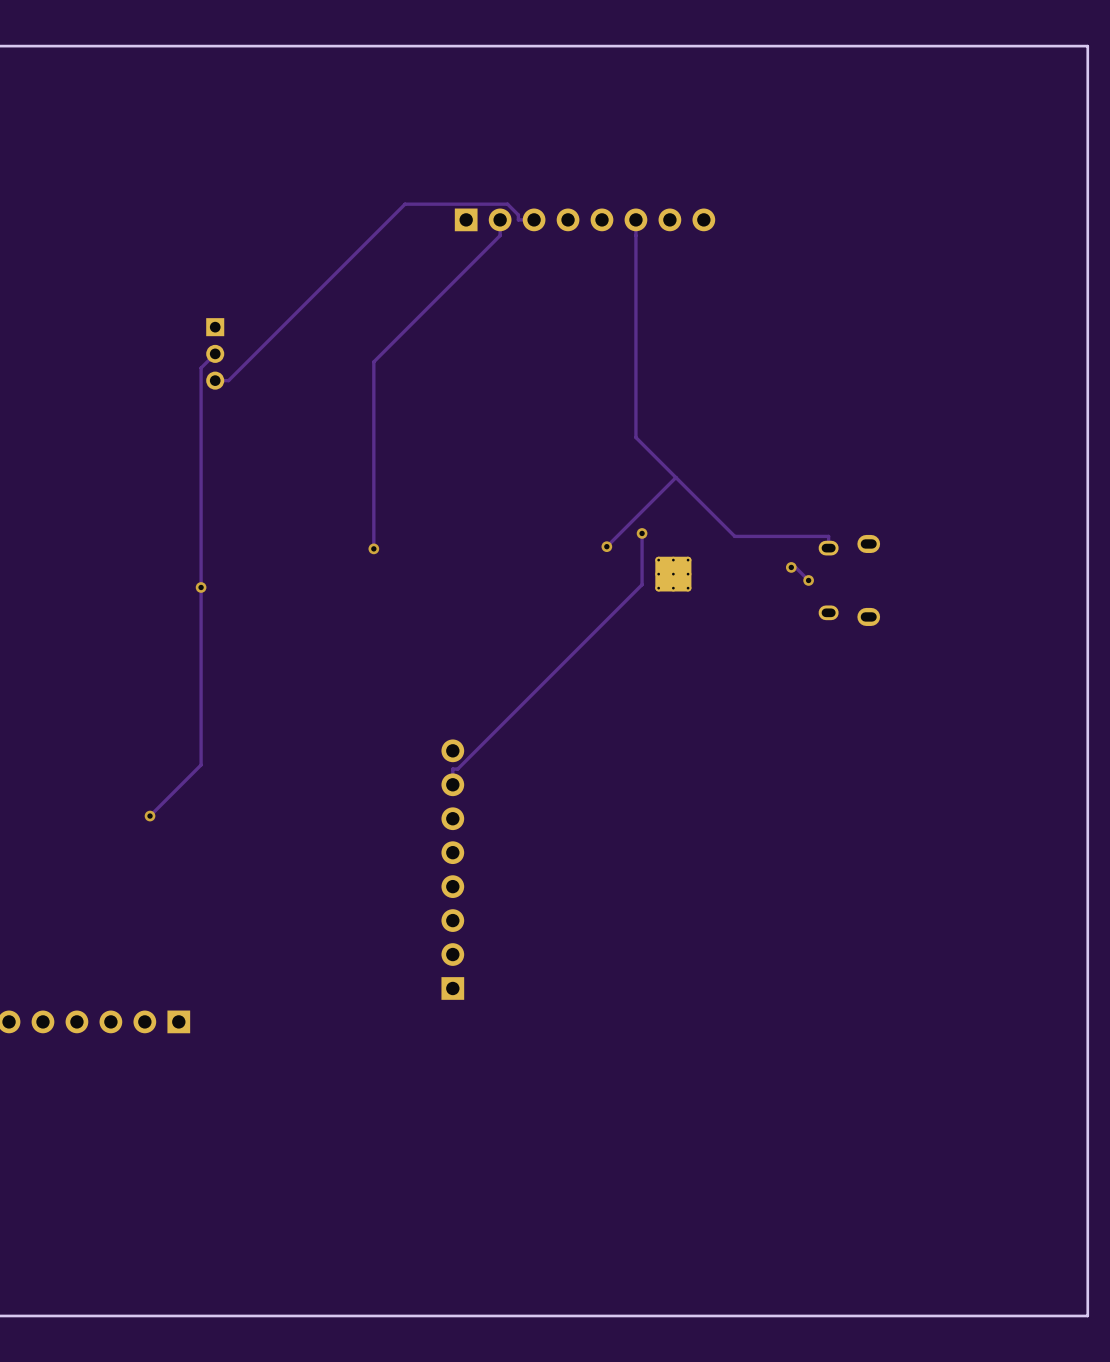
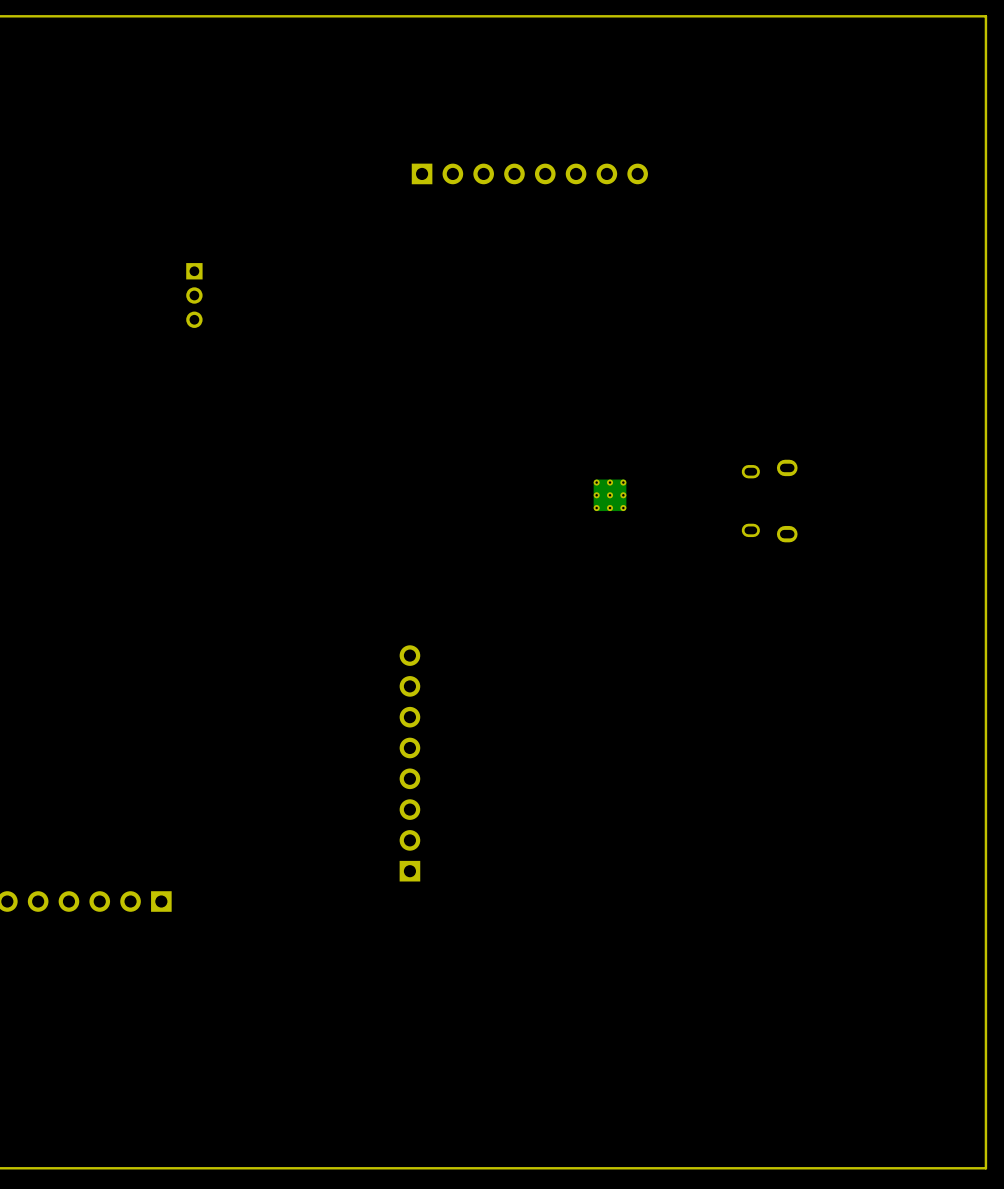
track: (500, 219) (500, 235) (373, 361) (373, 548) -> none
track: (534, 219) (518, 219) (518, 214) (507, 204) (405, 204) (228, 380) (215, 380) -> none
track: (635, 219) (635, 437) (734, 536) (828, 536) (828, 548) -> none
track: (215, 353) (201, 368) (201, 764) (150, 816) -> none
track: (675, 477) (606, 546) -> none
track: (642, 533) (642, 584) (457, 769) (452, 769) (452, 784) -> none
via: (642, 533) -> none
via: (606, 546) -> none
via: (373, 548) -> none
track: (791, 567) (795, 567) (808, 580) -> none
via: (791, 567) -> none
via: (808, 580) -> none
via: (201, 587) -> none
via: (150, 816) -> none

